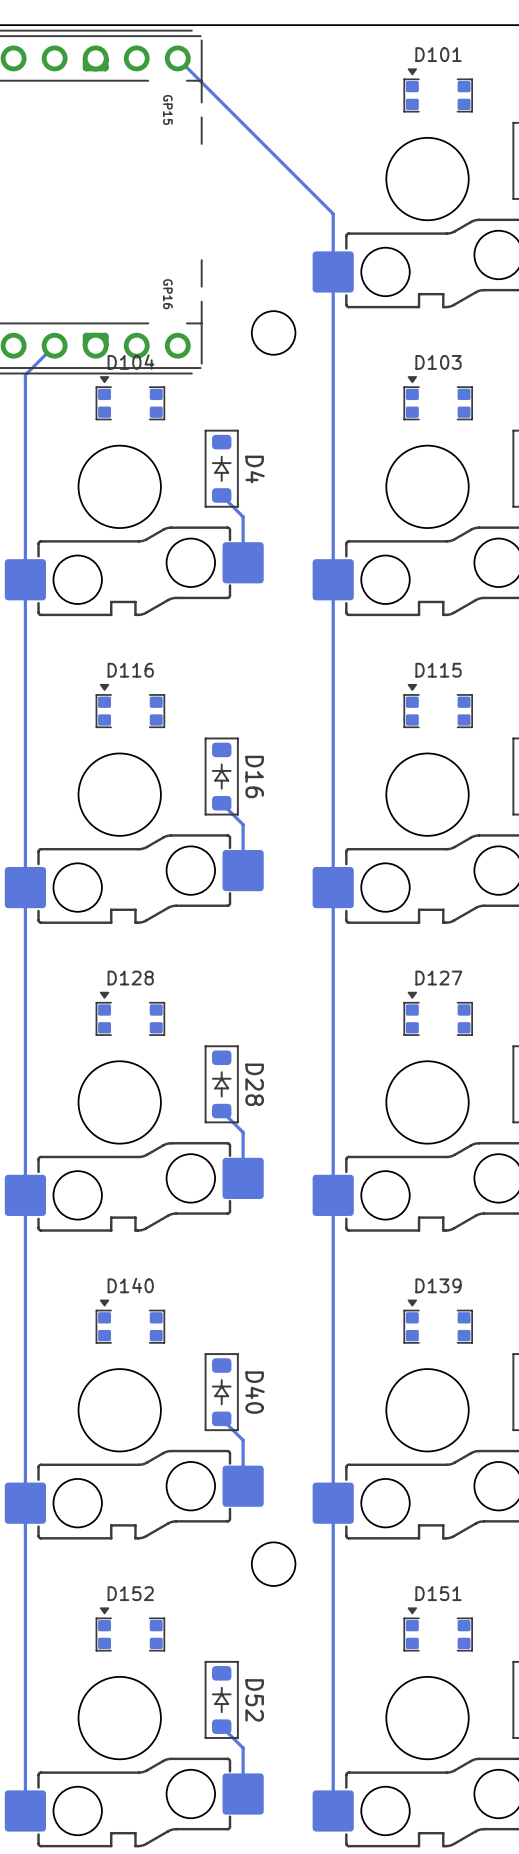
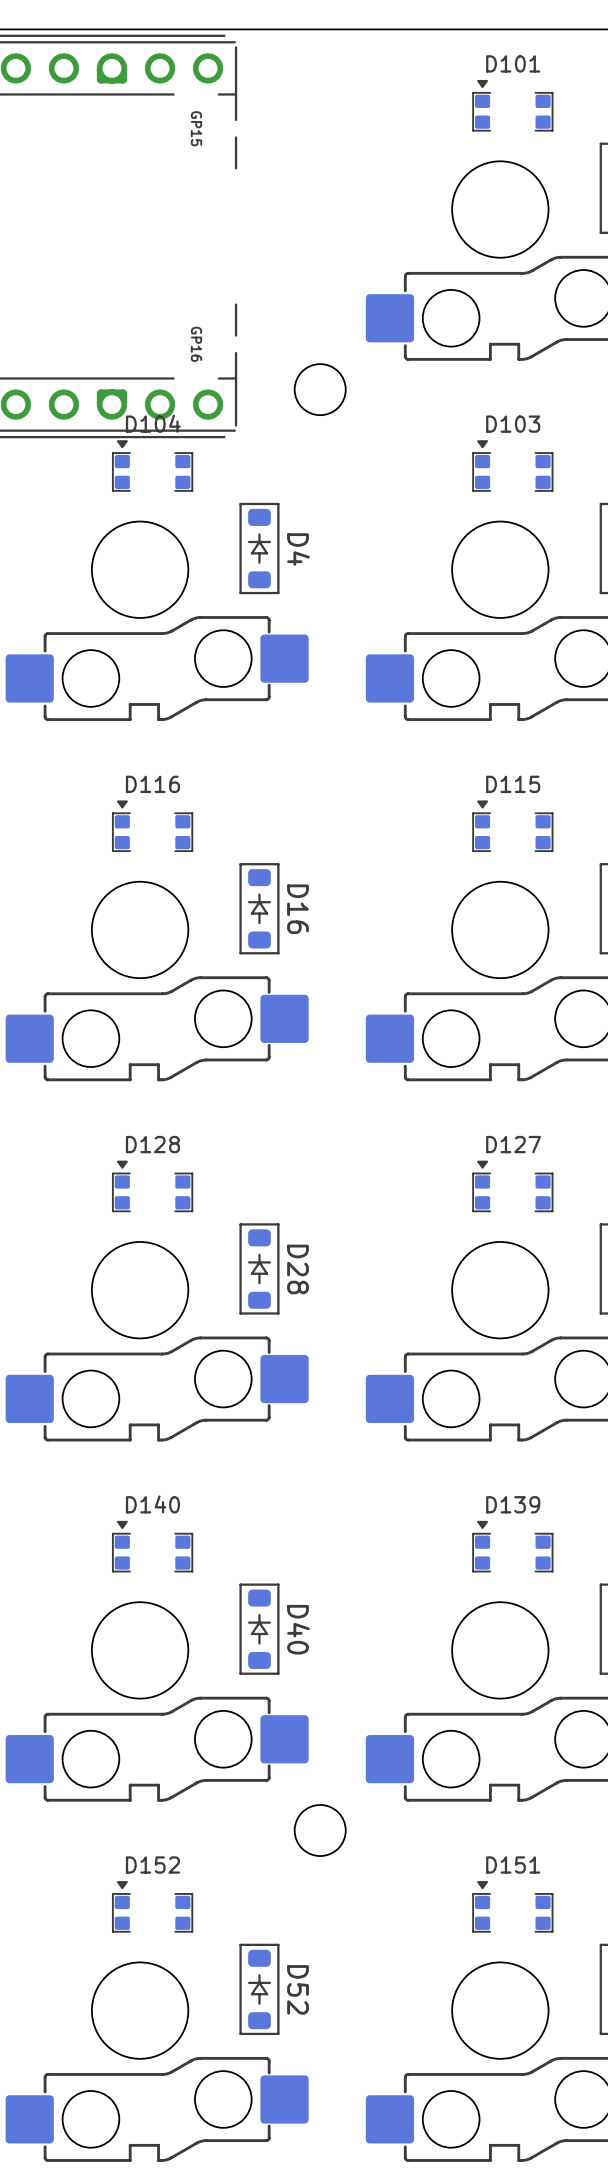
track: (177, 58) (333, 213) (333, 1810) -> none
track: (54, 345) (25, 374) (25, 1810) -> none
track: (221, 495) (243, 516) (243, 562) -> none
track: (221, 803) (243, 824) (243, 870) -> none
track: (221, 1111) (243, 1132) (243, 1178) -> none
track: (221, 1418) (243, 1440) (243, 1486) -> none
track: (221, 1726) (243, 1748) (243, 1794) -> none

